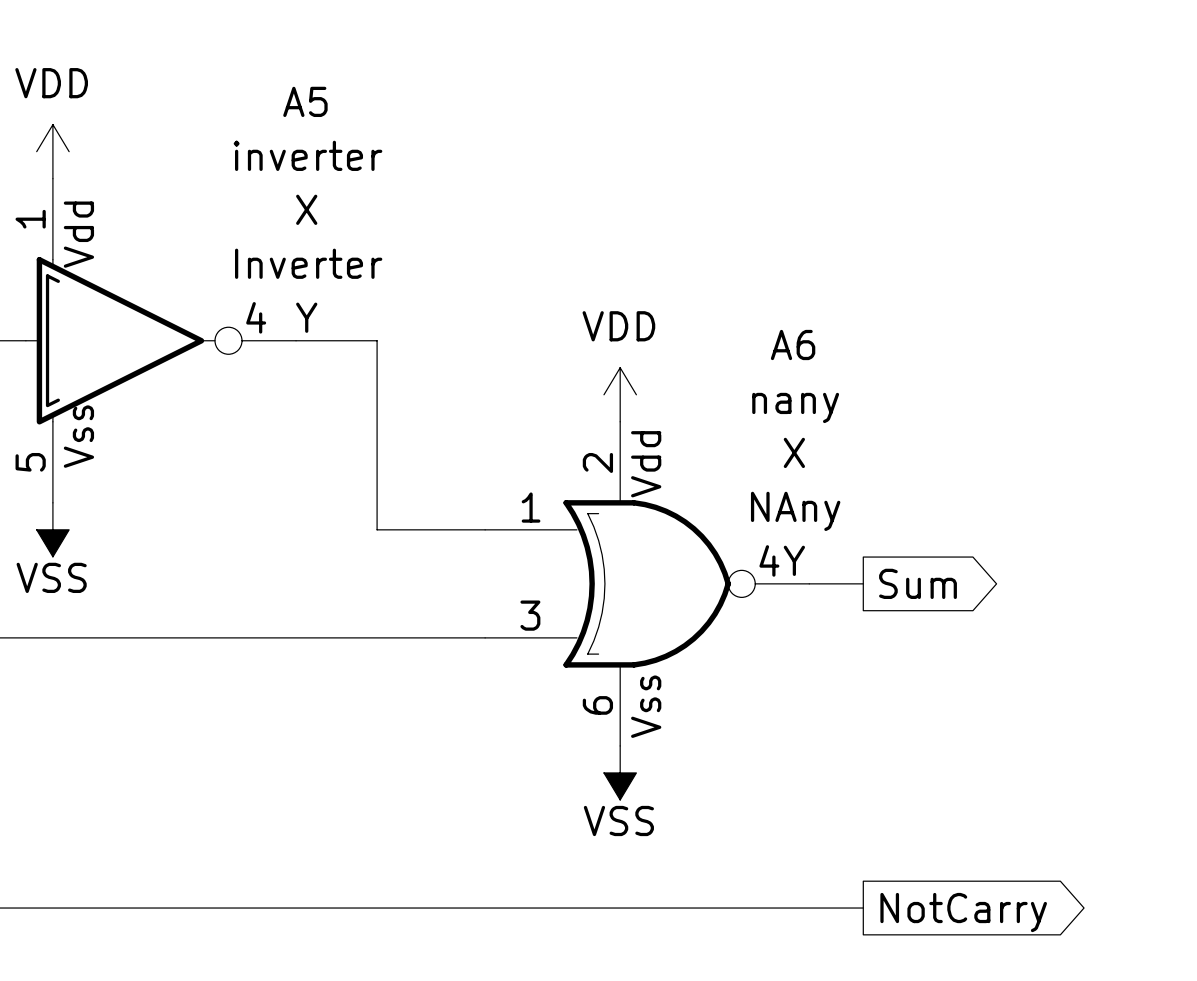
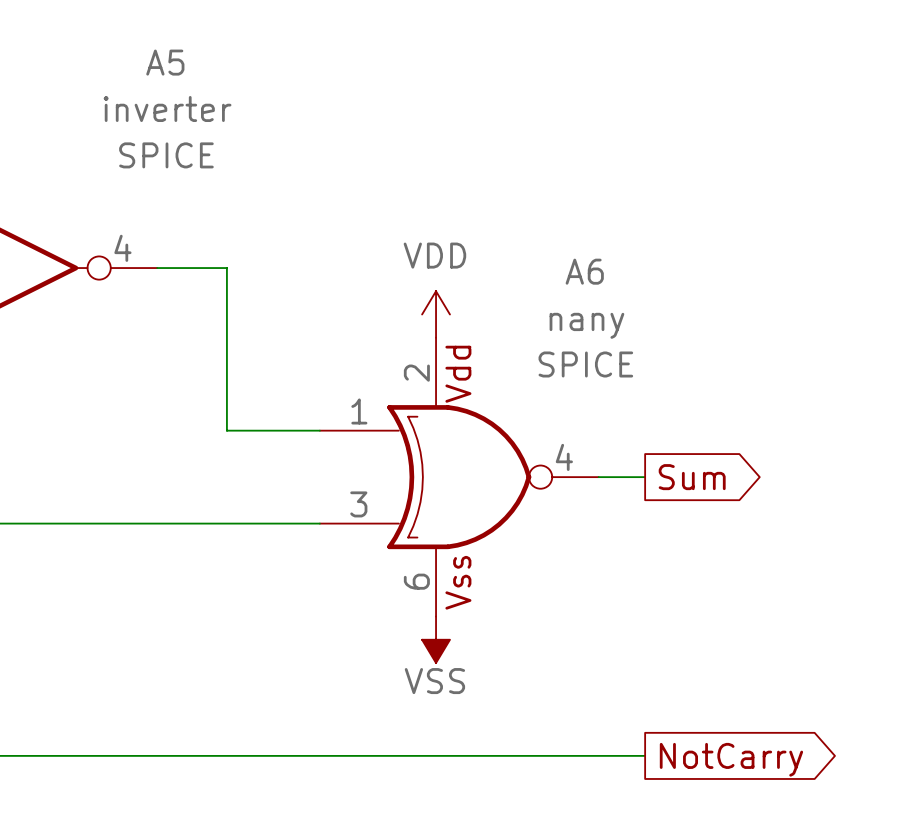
A5 text: none -> SPICE (166, 155)
A5 text: X (306, 209) -> none
A5 text: Inverter (308, 263) -> none
A5 text: Y (306, 317) -> none
A6 text: none -> SPICE (585, 364)
A6 text: X (794, 452) -> none
A6 text: NAny (795, 511) -> none
A6 text: Y (794, 560) -> none

